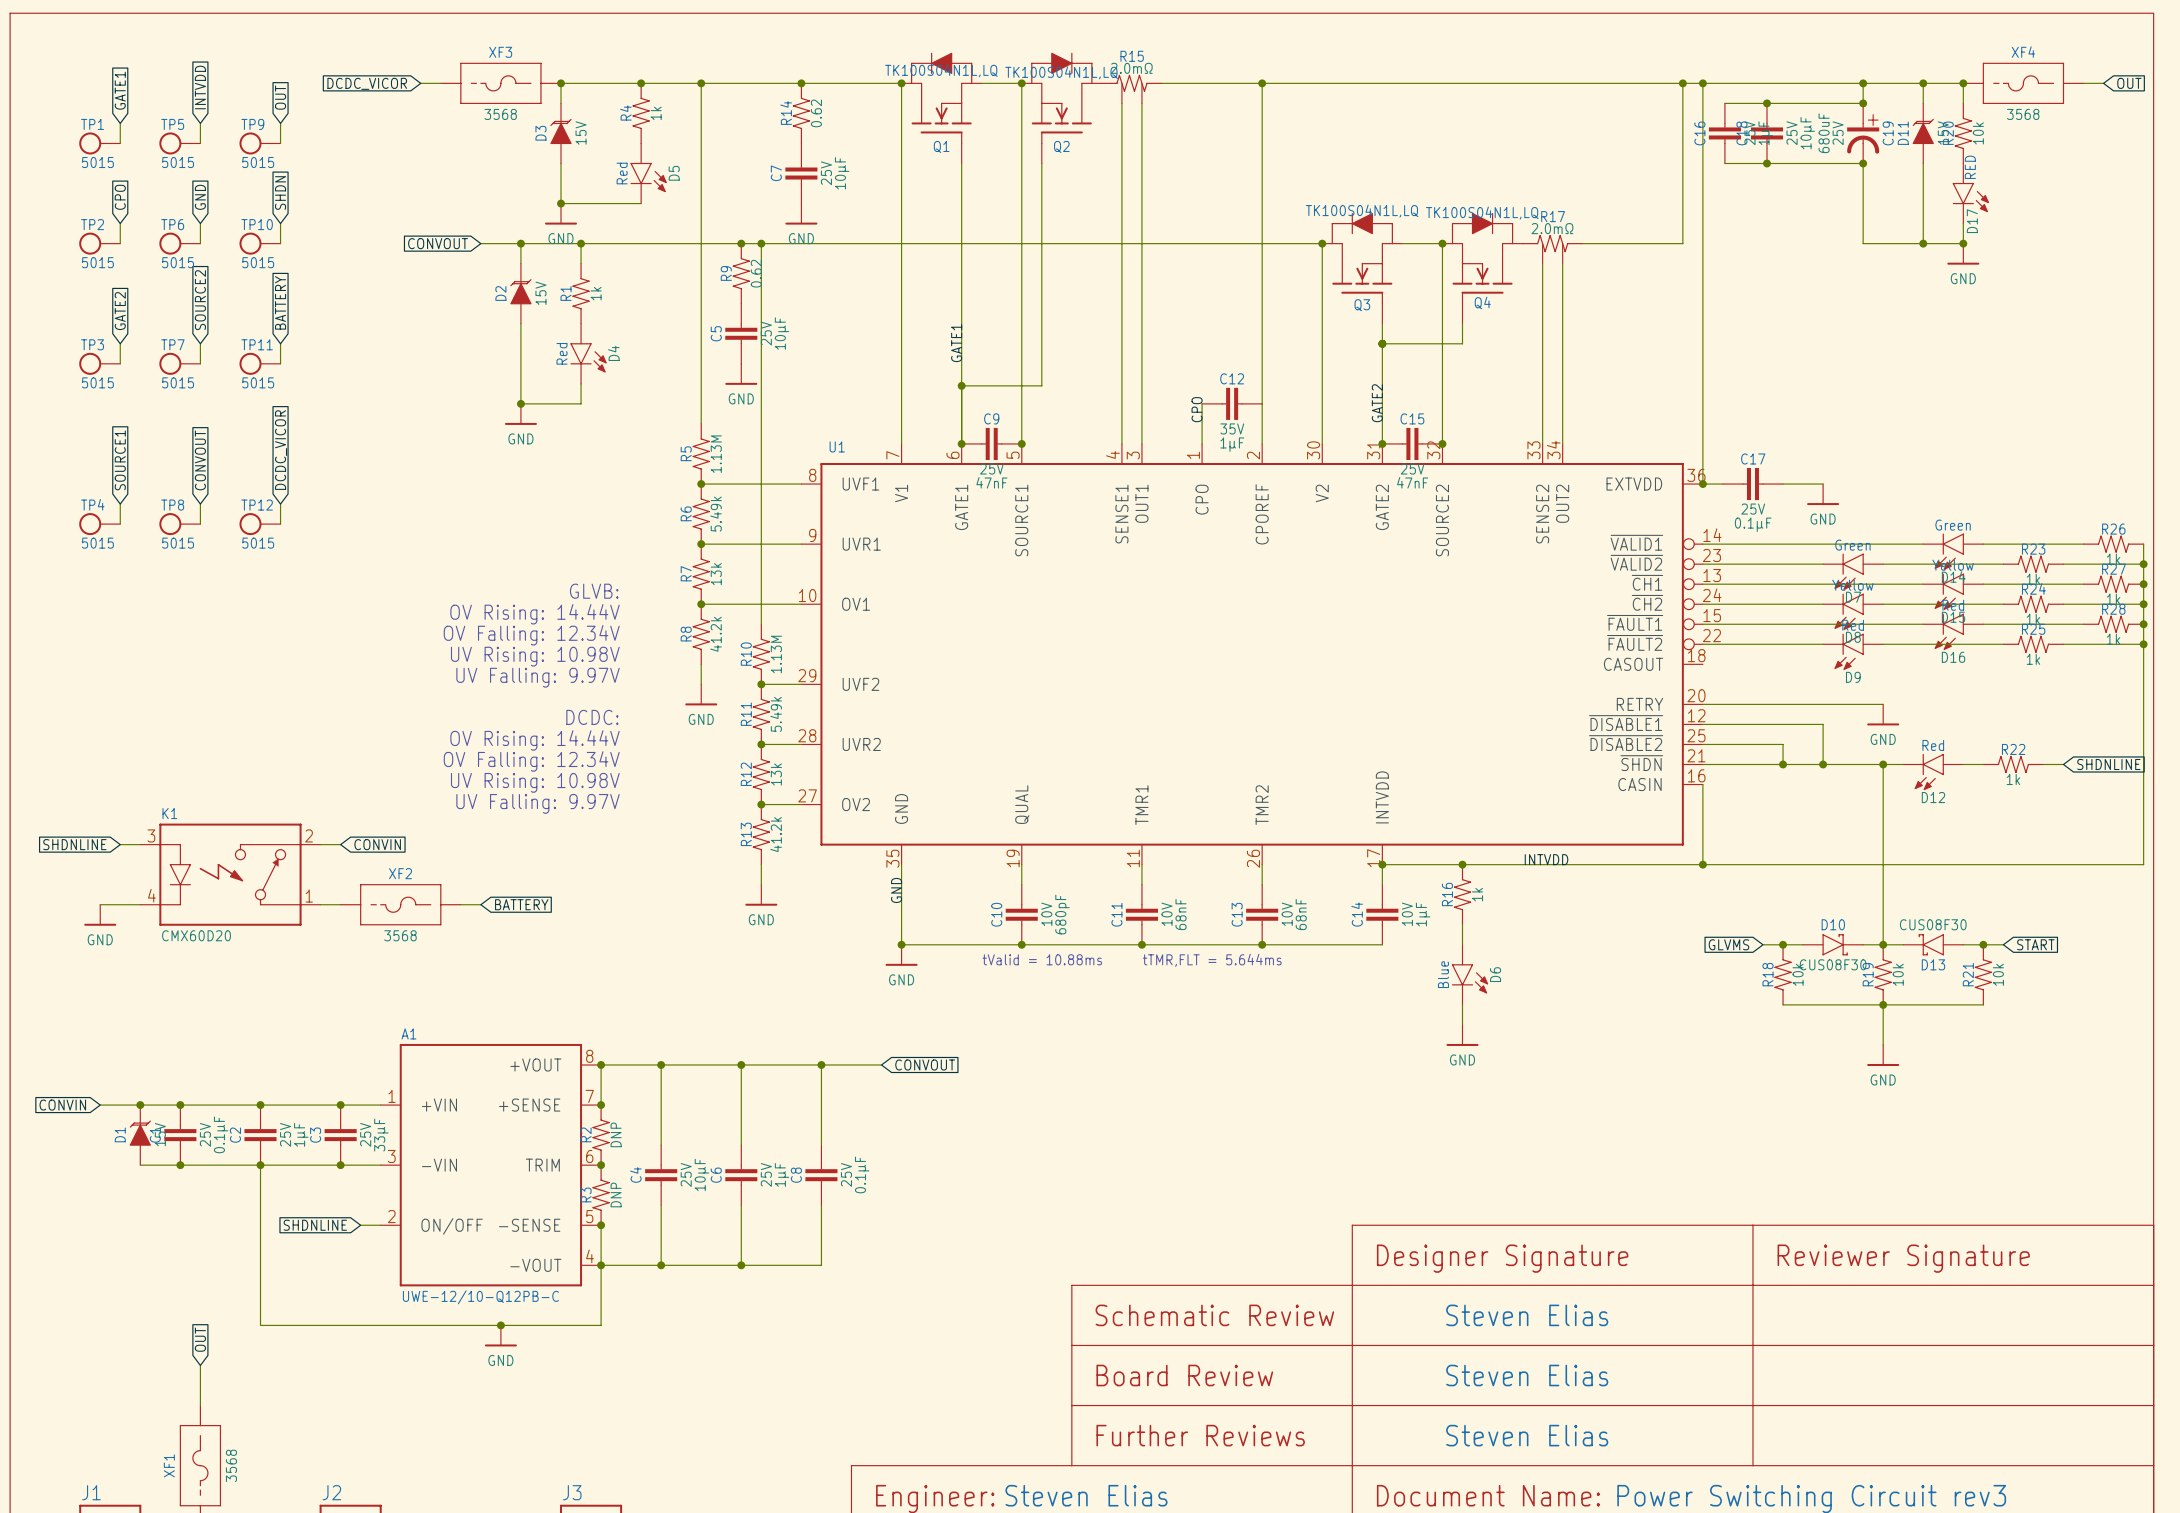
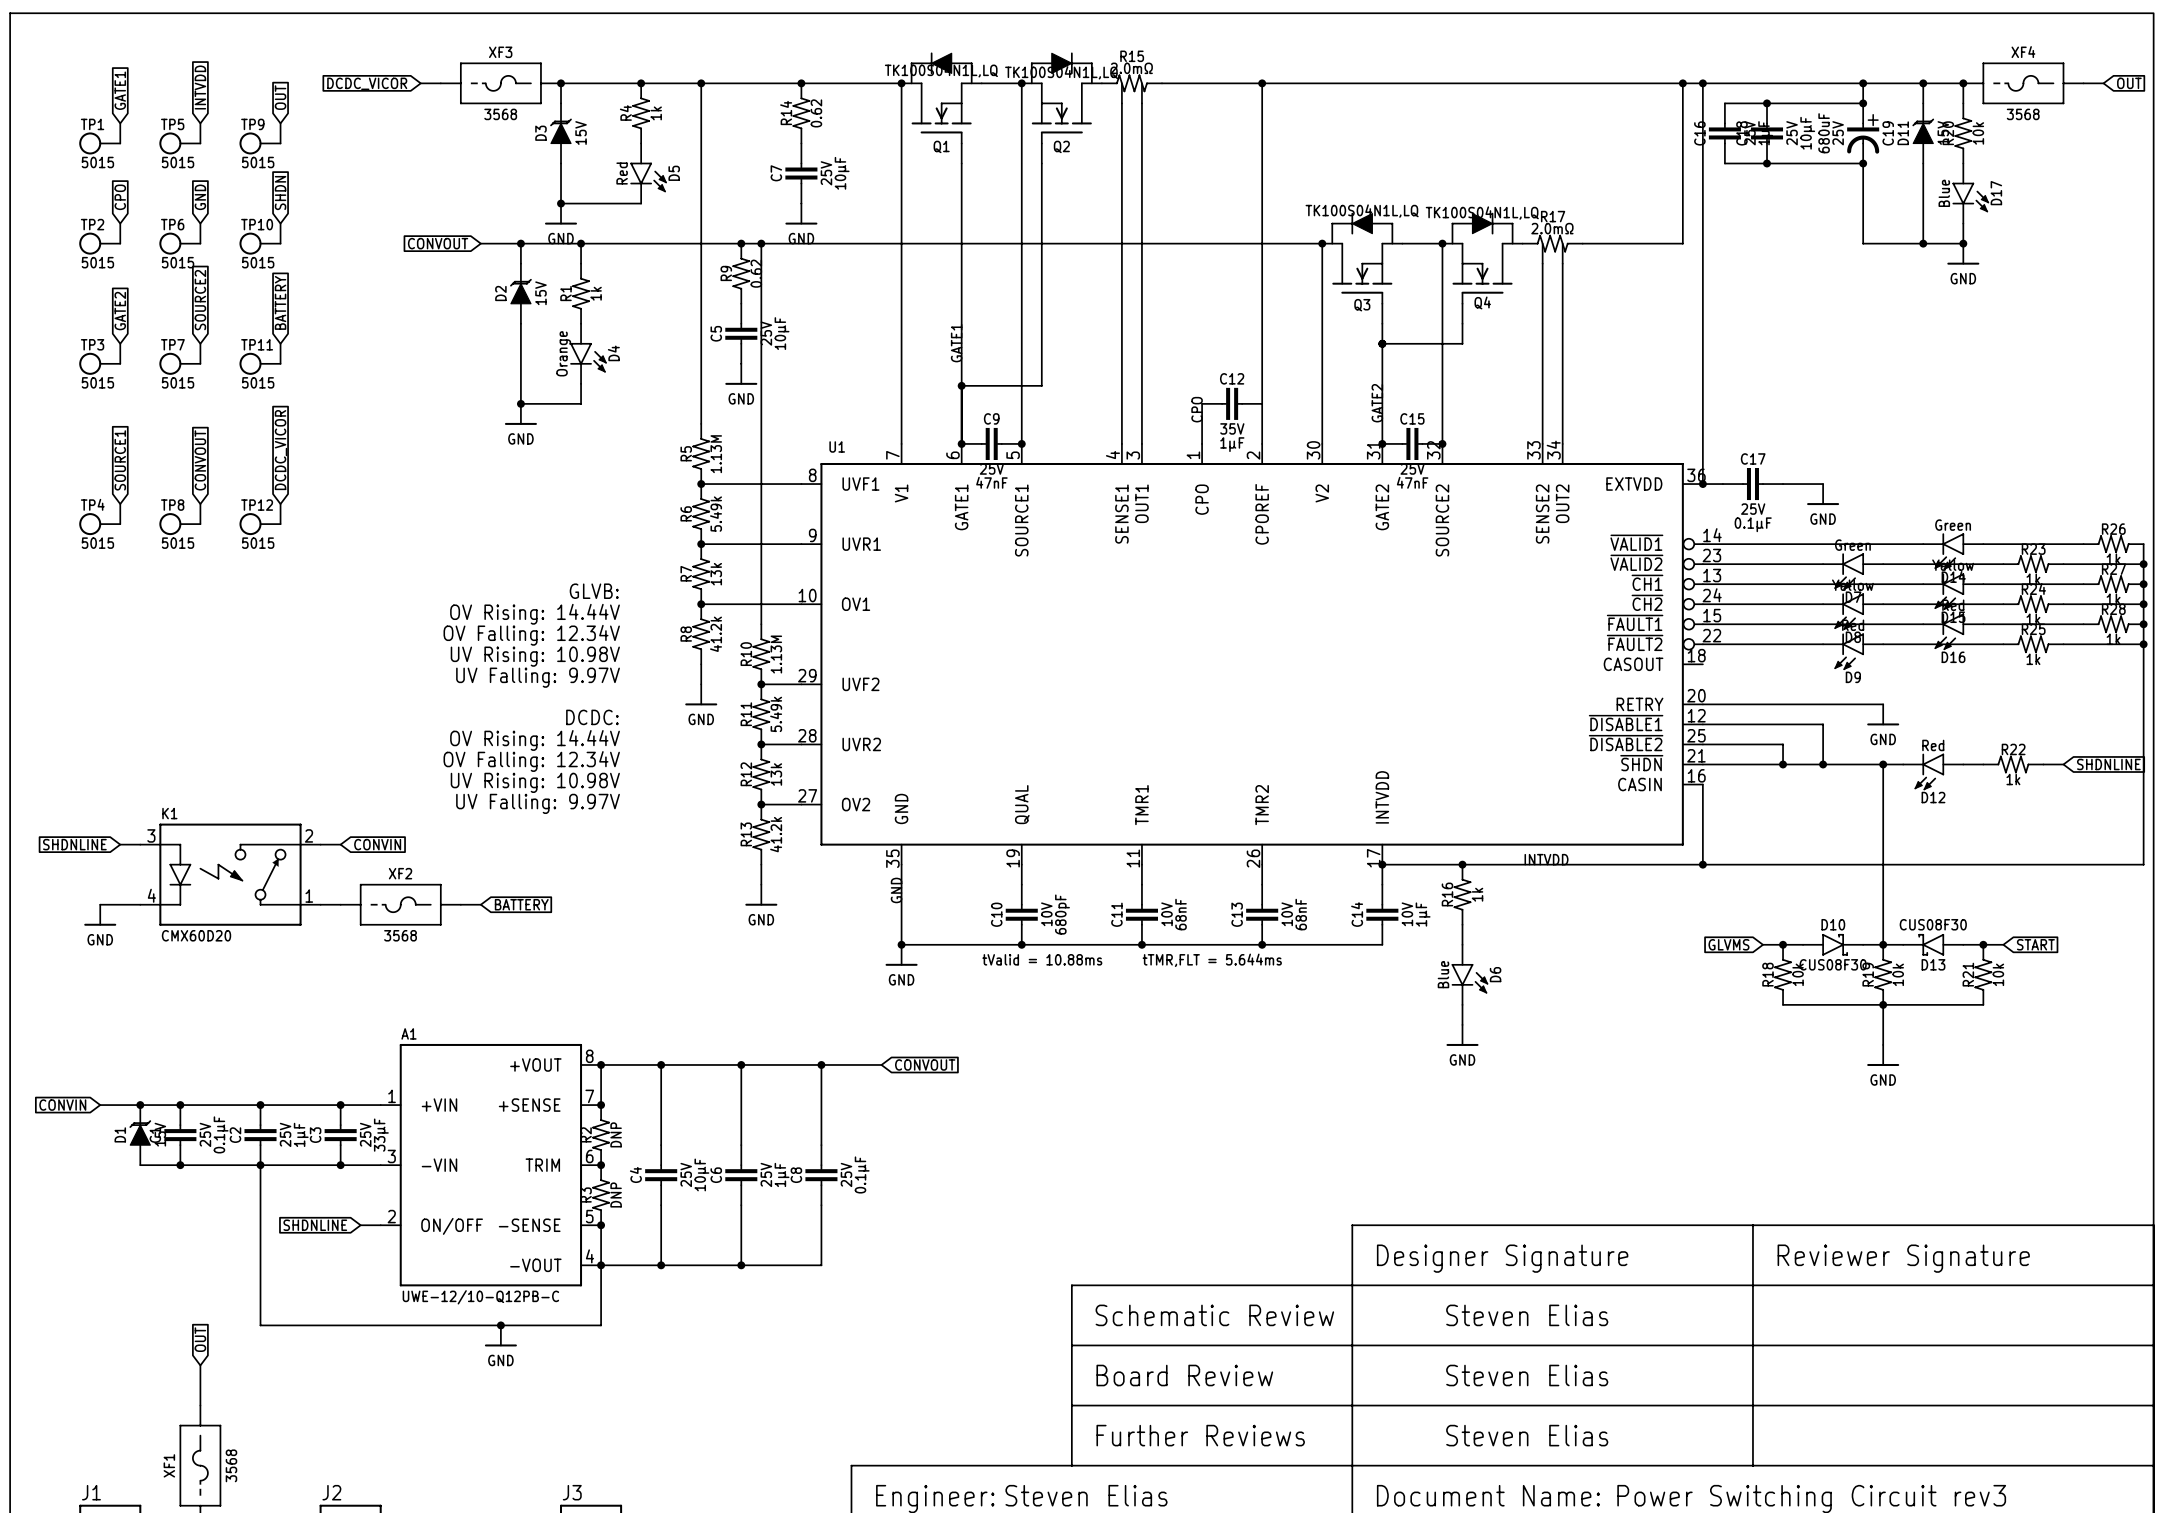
D17 value: RED (1970, 167) -> none
D17 text: none -> Blue (1944, 193)
D17 name position: D17 (1972, 221) -> D17 (1996, 193)
D4 text: Red (562, 353) -> Orange (563, 353)

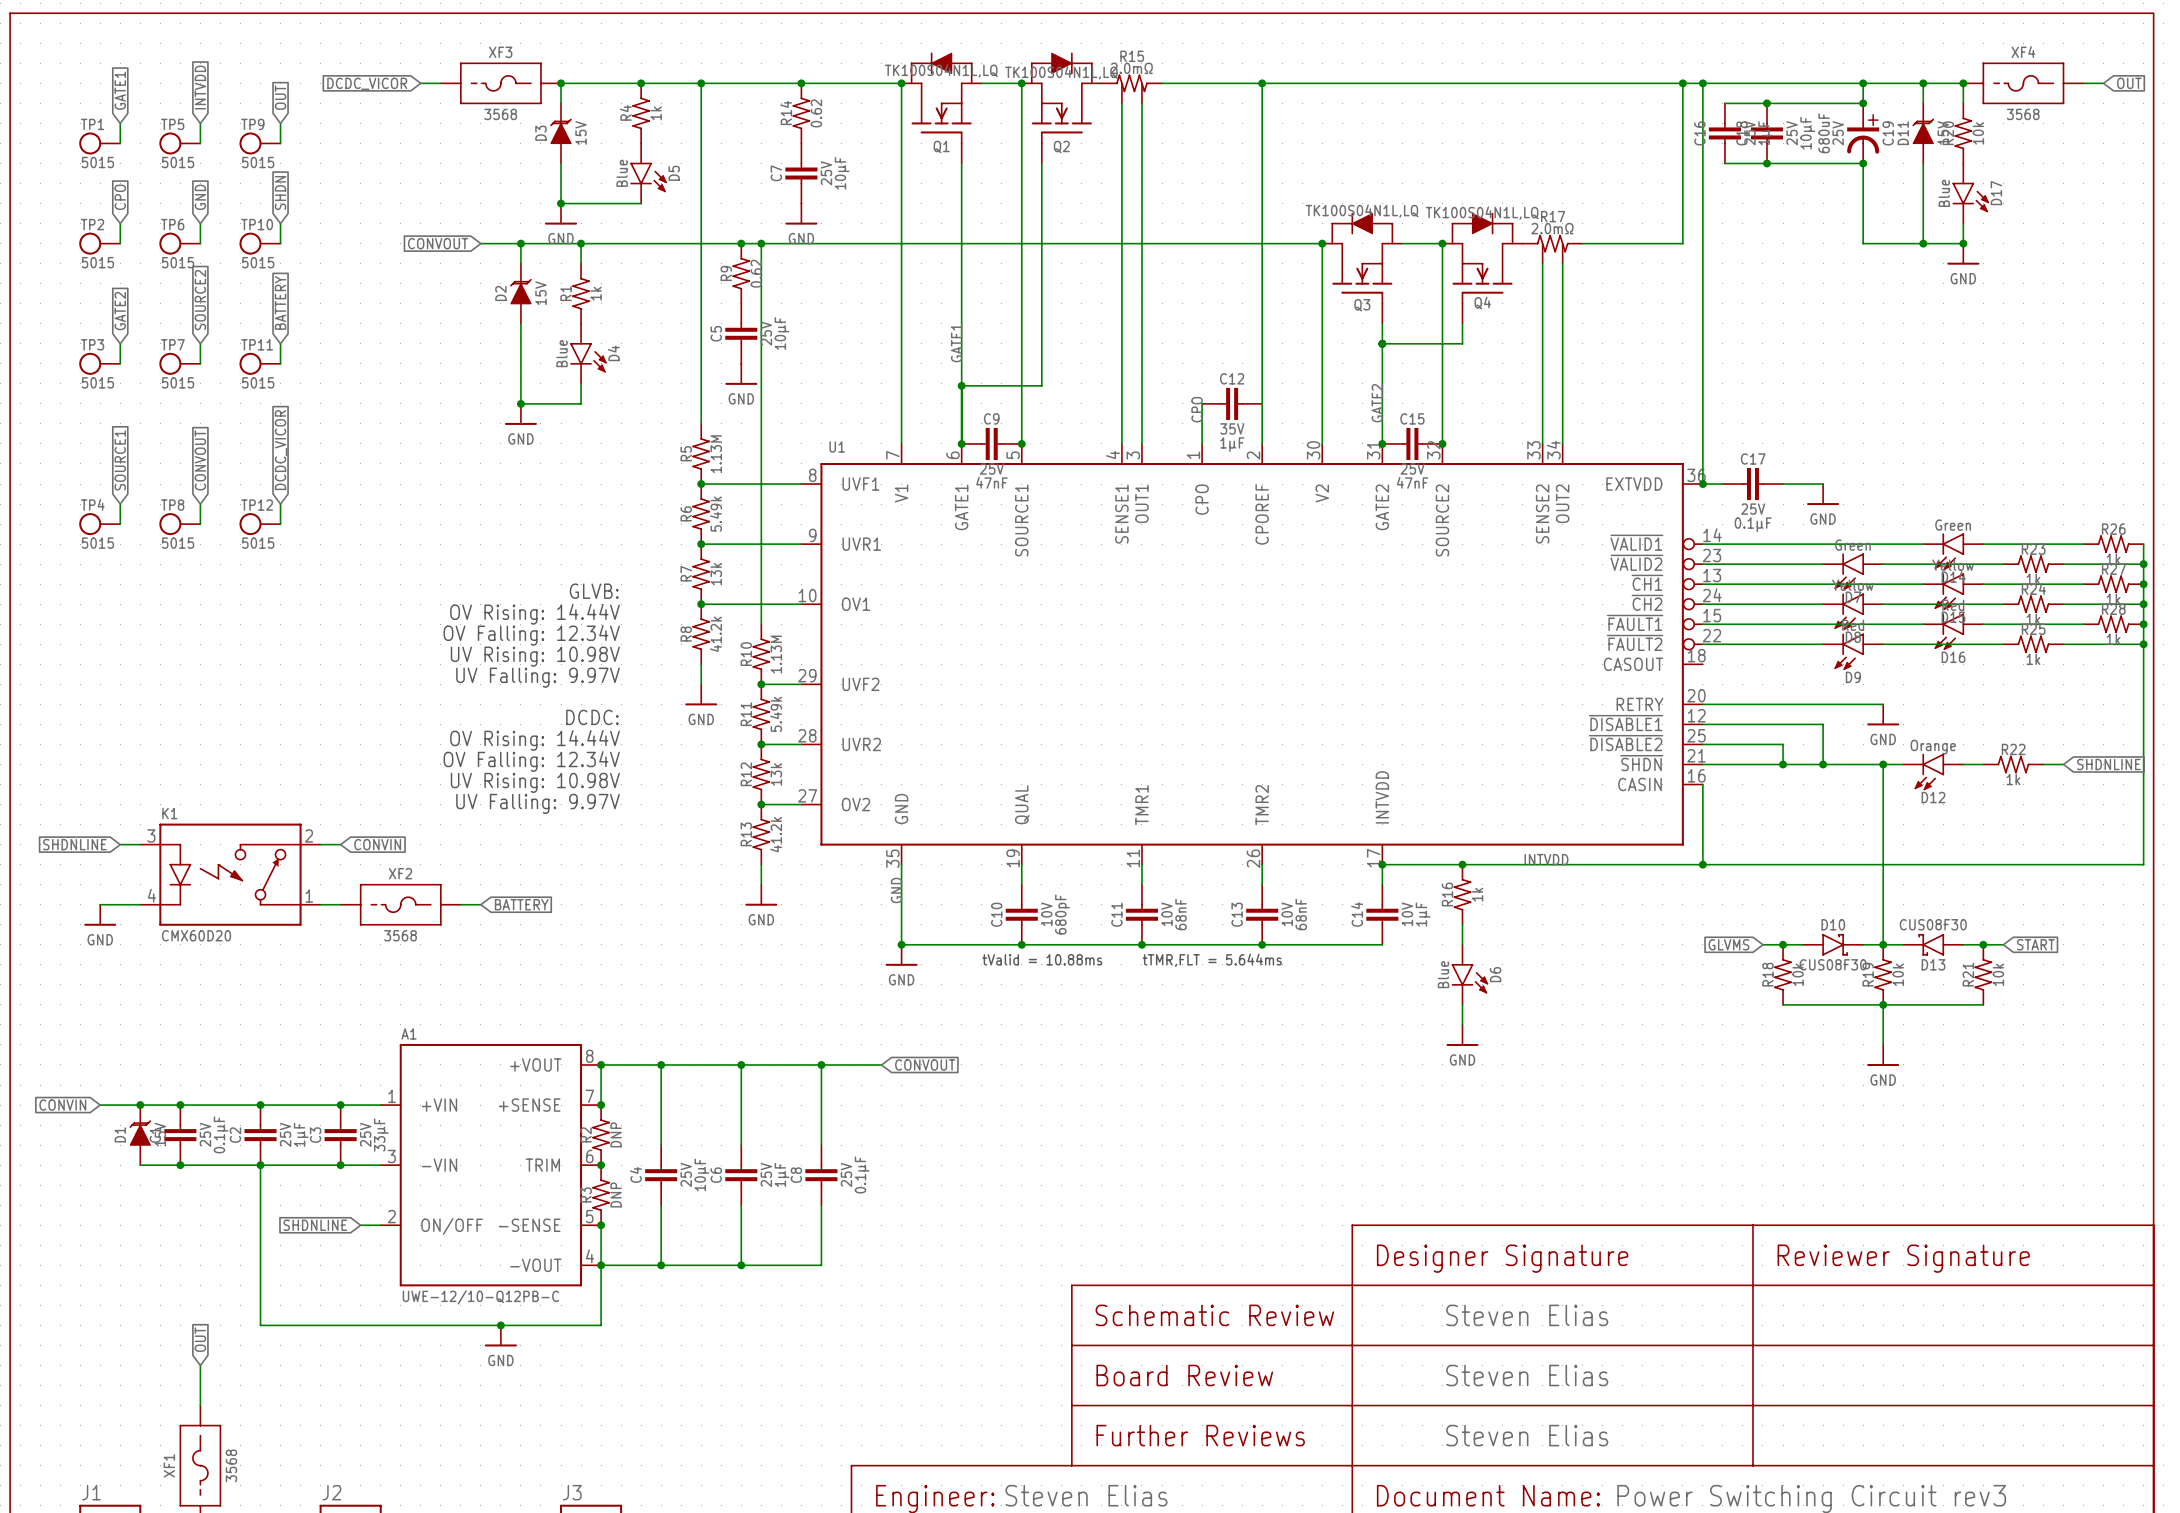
D5 text: Red (622, 173) -> Blue (622, 173)
D4 text: Orange (563, 353) -> Blue (562, 353)
D12 text: Red (1933, 745) -> Orange (1933, 747)

